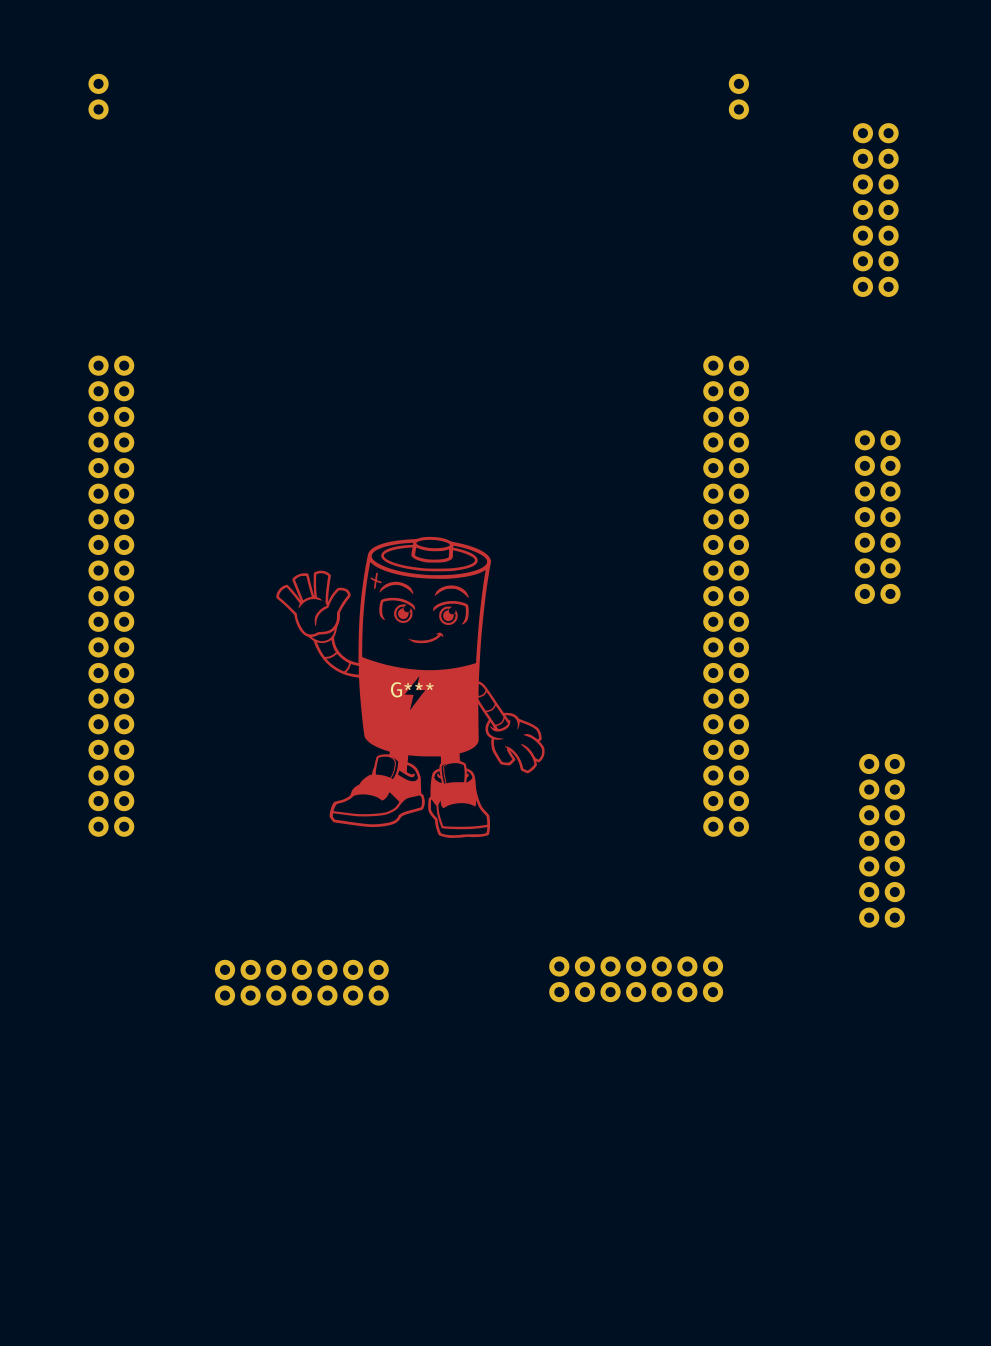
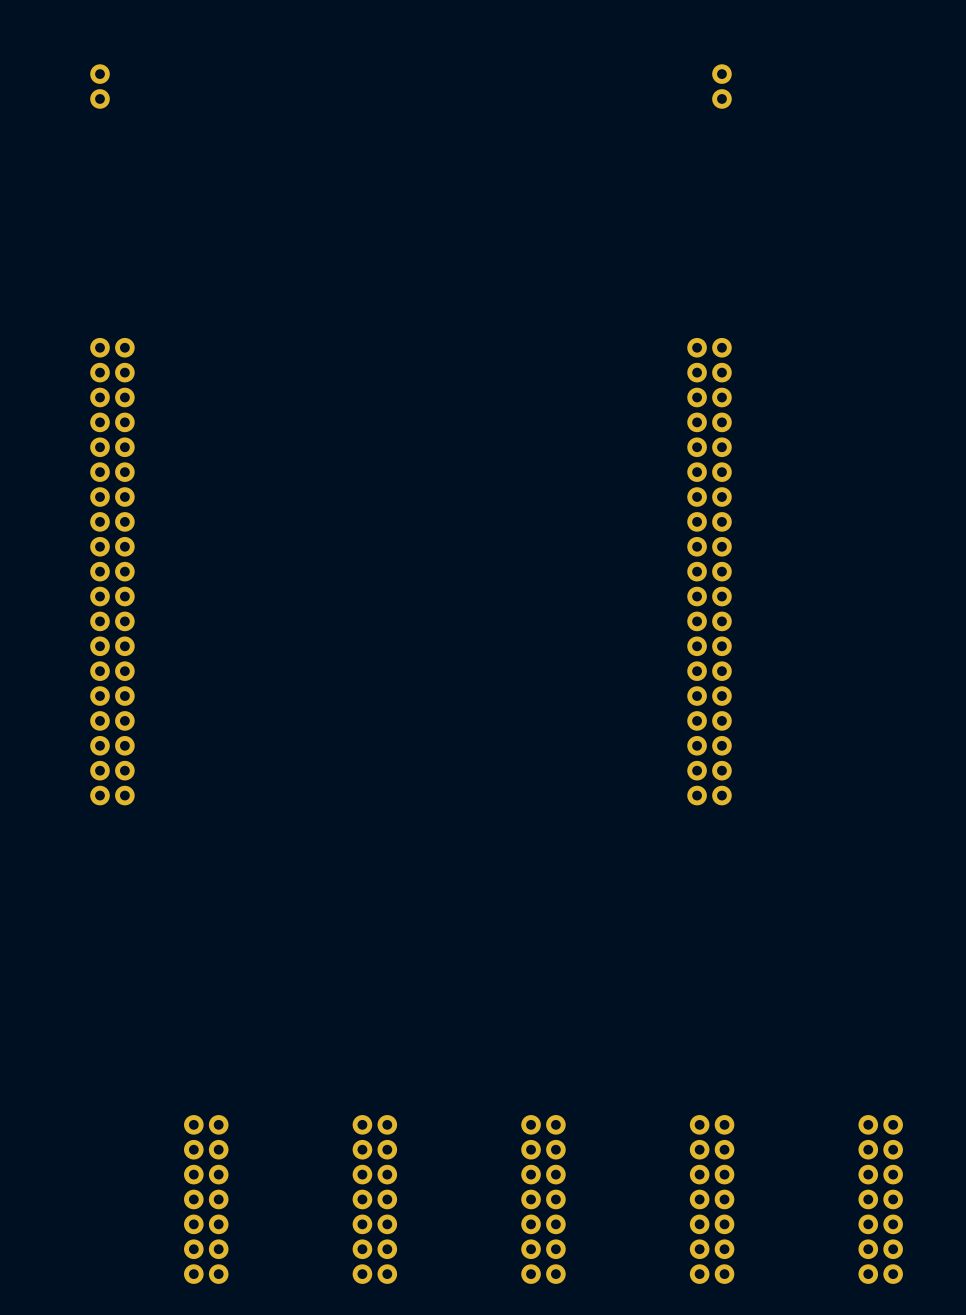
part: (875, 210) -> none
part: (877, 517) -> none
G***: (410, 687) -> none
part: (882, 840) -> none
part: (636, 979) -> none
part: (301, 982) -> none
part: none -> (206, 1199)
part: none -> (374, 1199)
part: none -> (543, 1199)
part: none -> (712, 1199)
part: none -> (880, 1199)

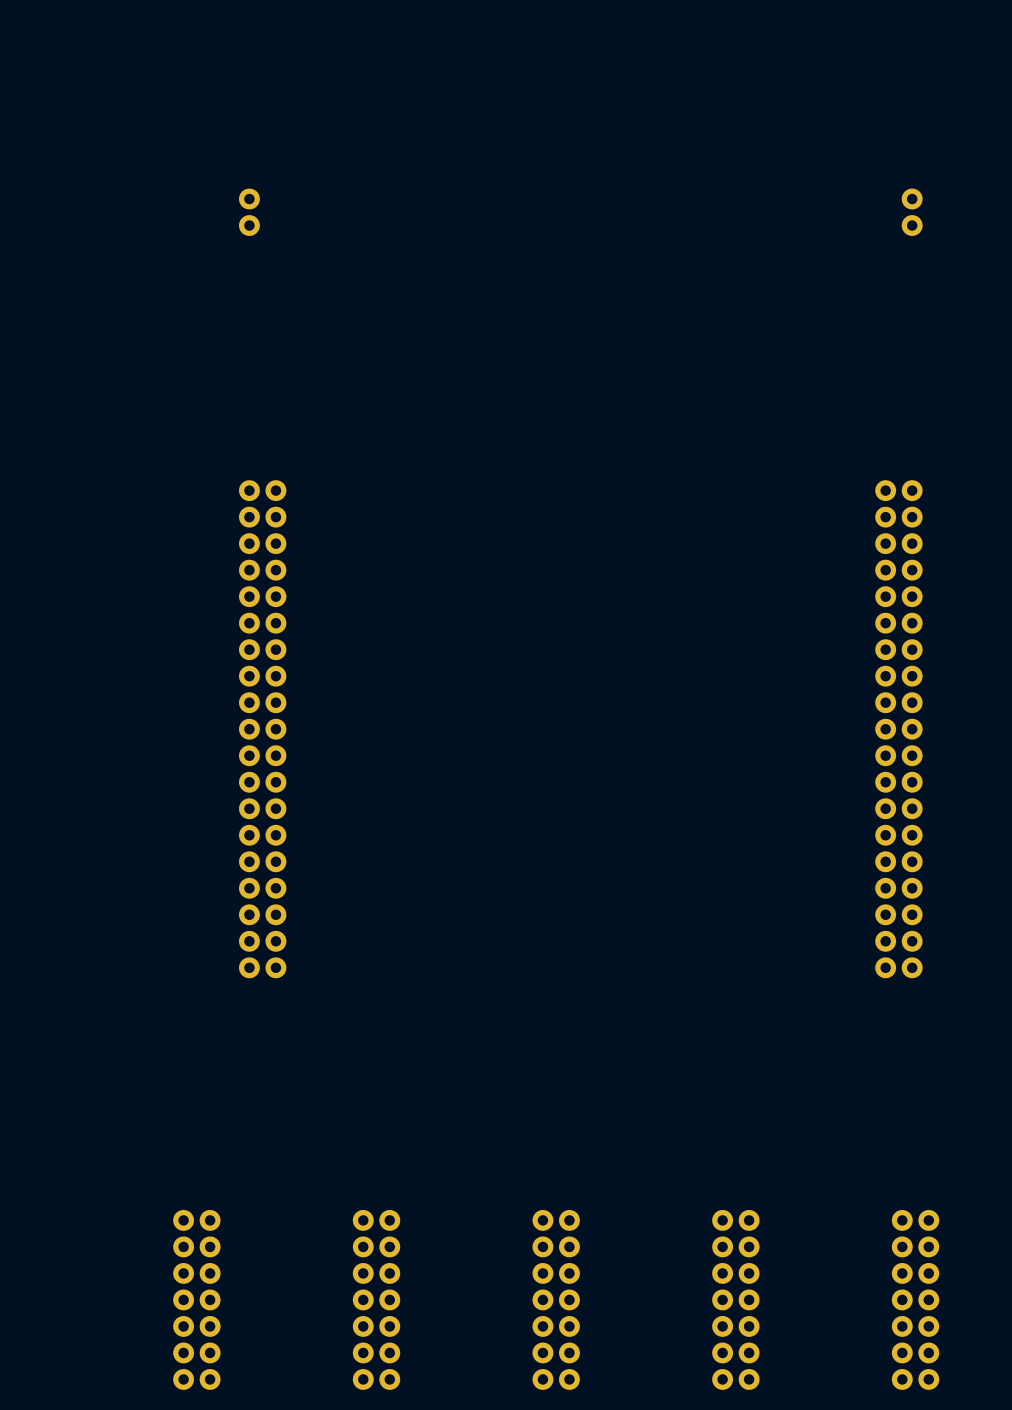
part position: (100, 86) -> (249, 212)
part position: (721, 86) -> (912, 212)
part position: (112, 571) -> (262, 729)
part position: (709, 571) -> (898, 729)

